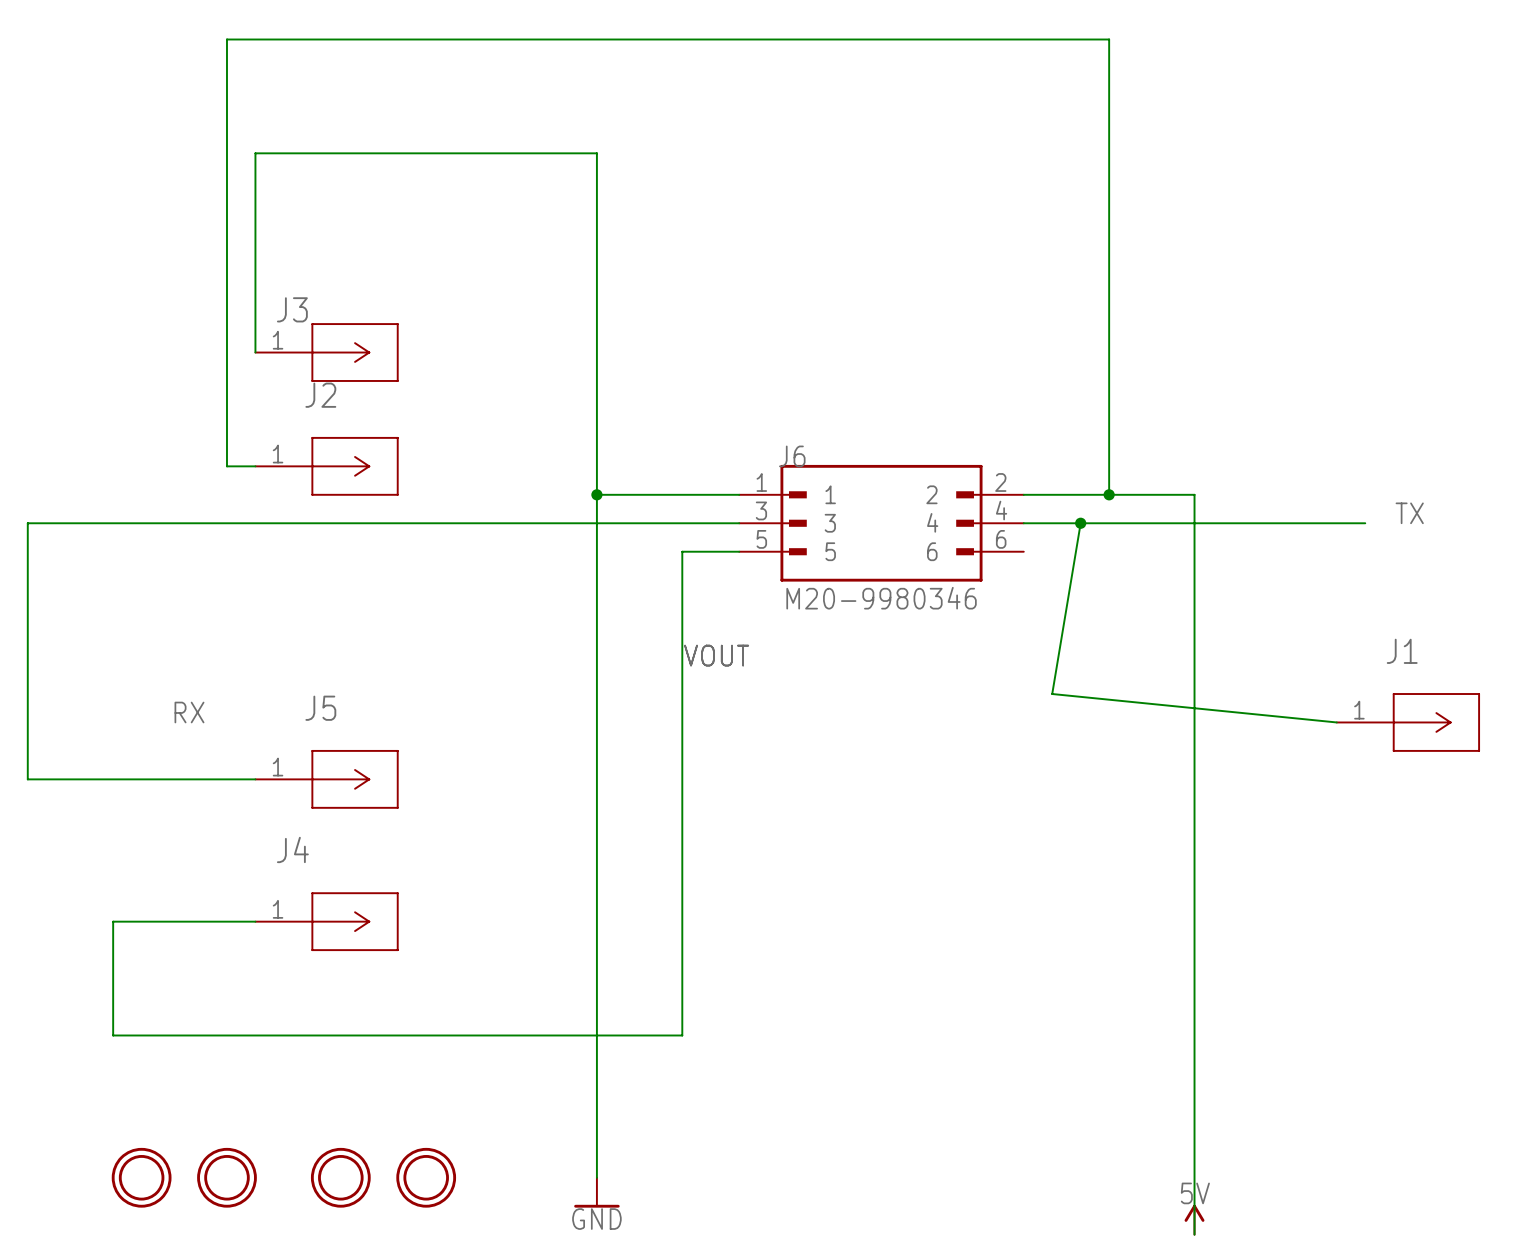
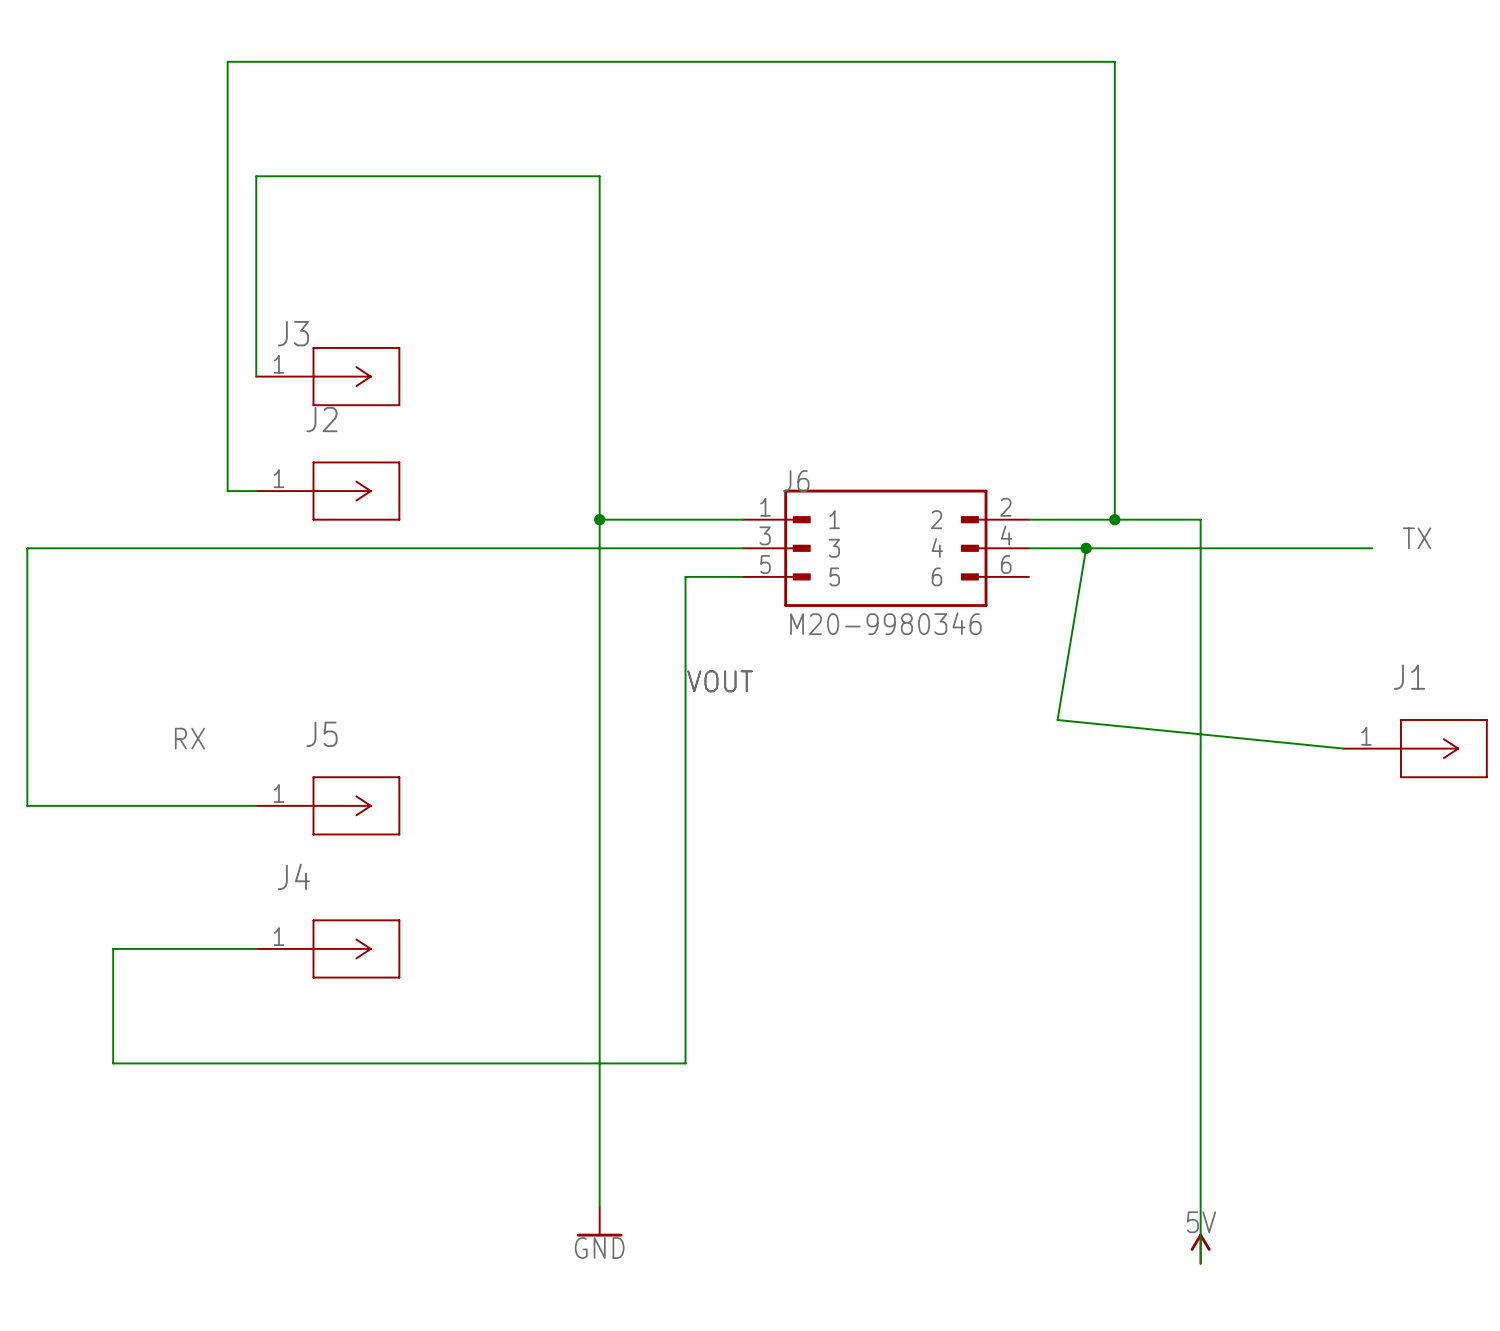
part: (141, 1177) -> none
part: (226, 1177) -> none
part: (340, 1177) -> none
part: (426, 1177) -> none

